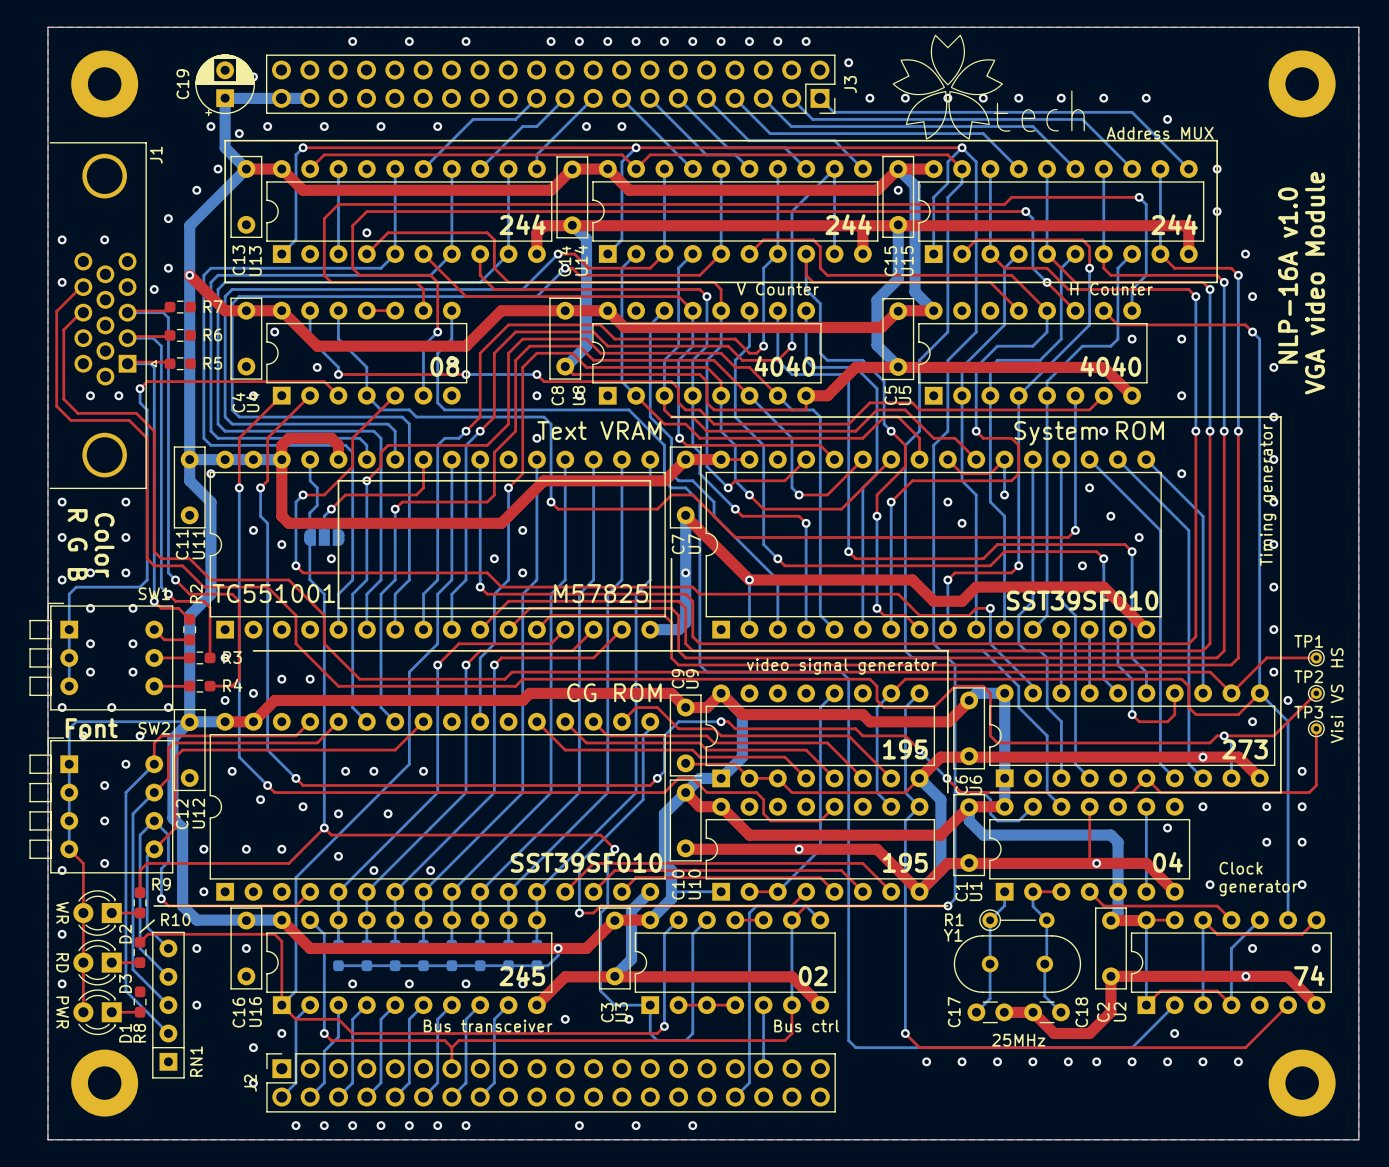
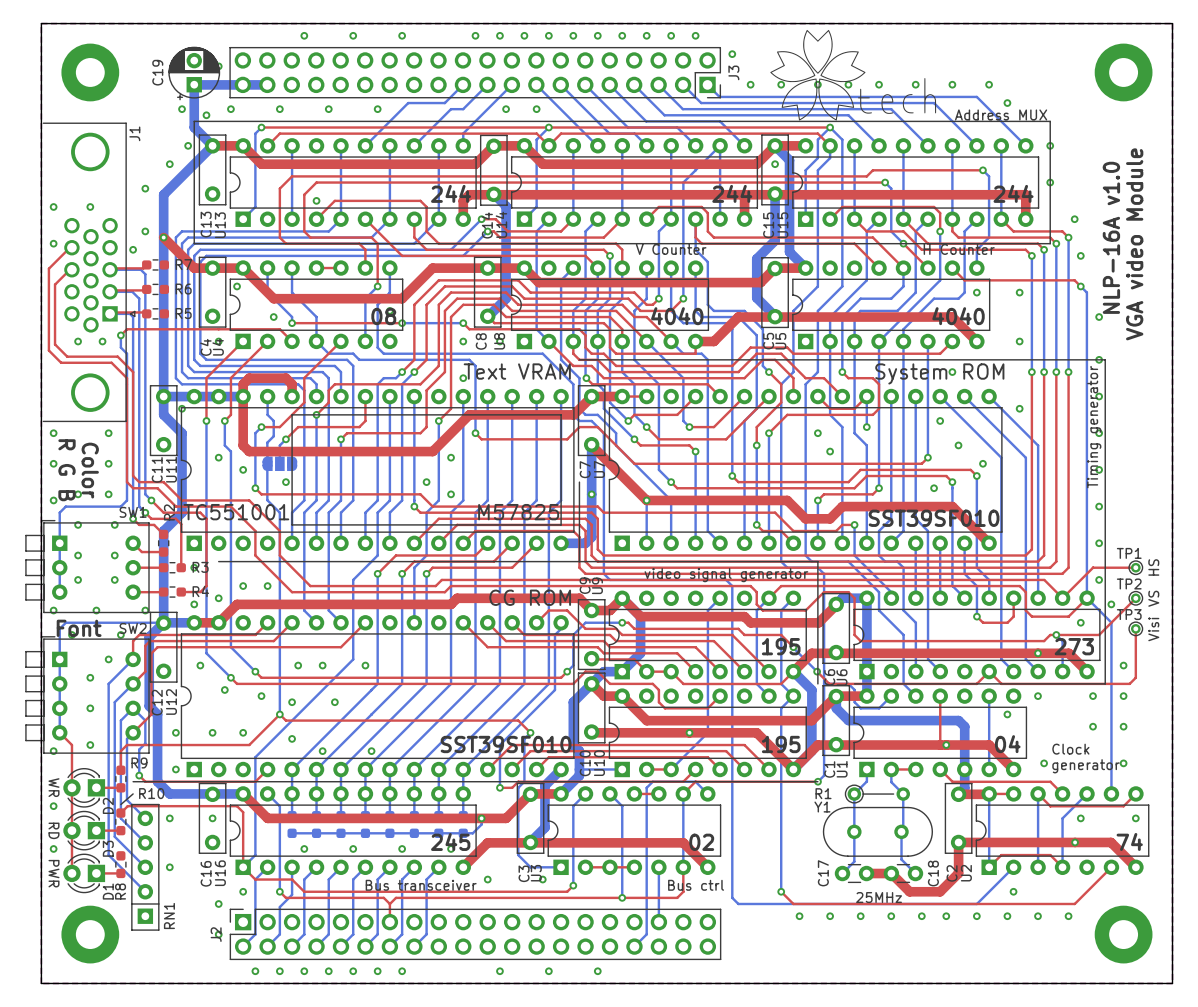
bottom track: (706, 920) (692, 934) (692, 1033) (685, 1040) (657, 1040) (650, 1033) (650, 1005) -> (609, 793) (622, 806)
bottom track: none -> (622, 806) (622, 897)
via: none -> (622, 897)

